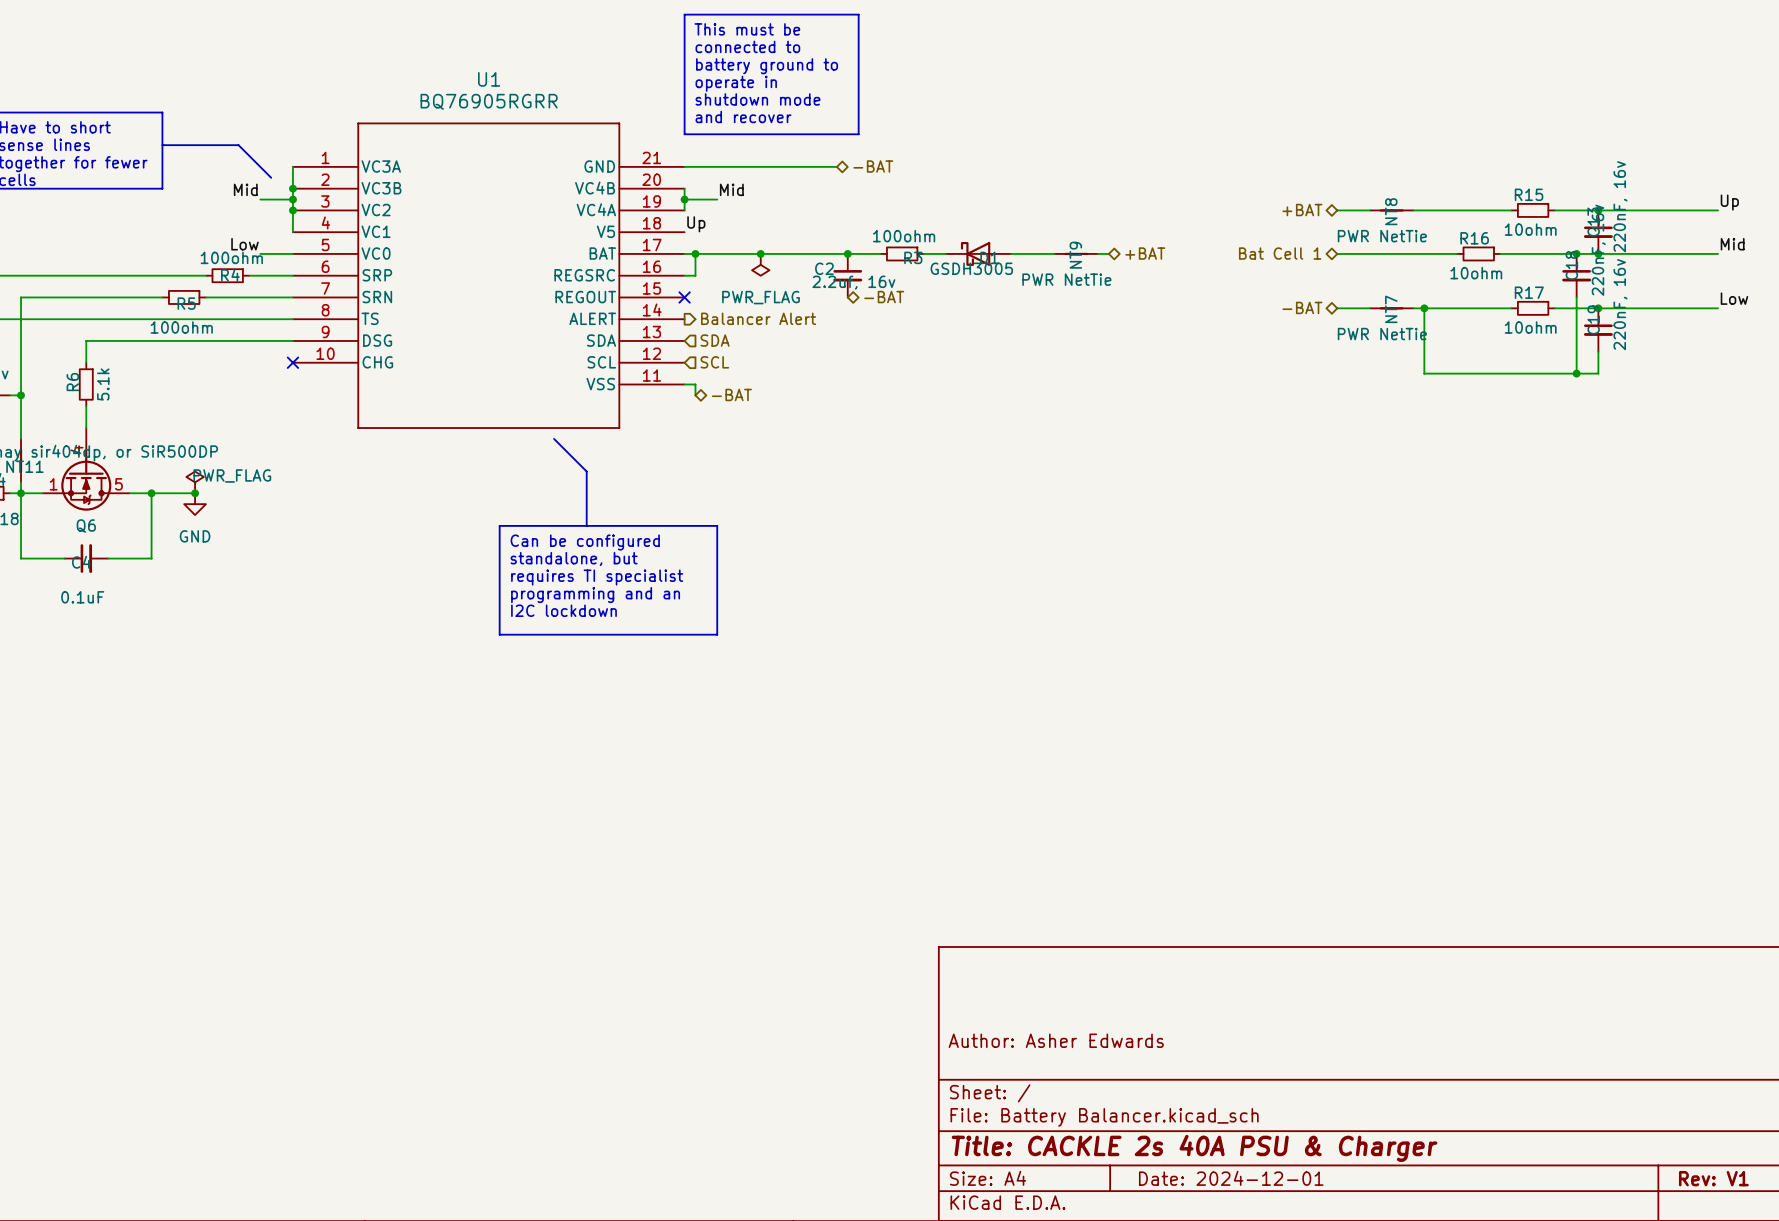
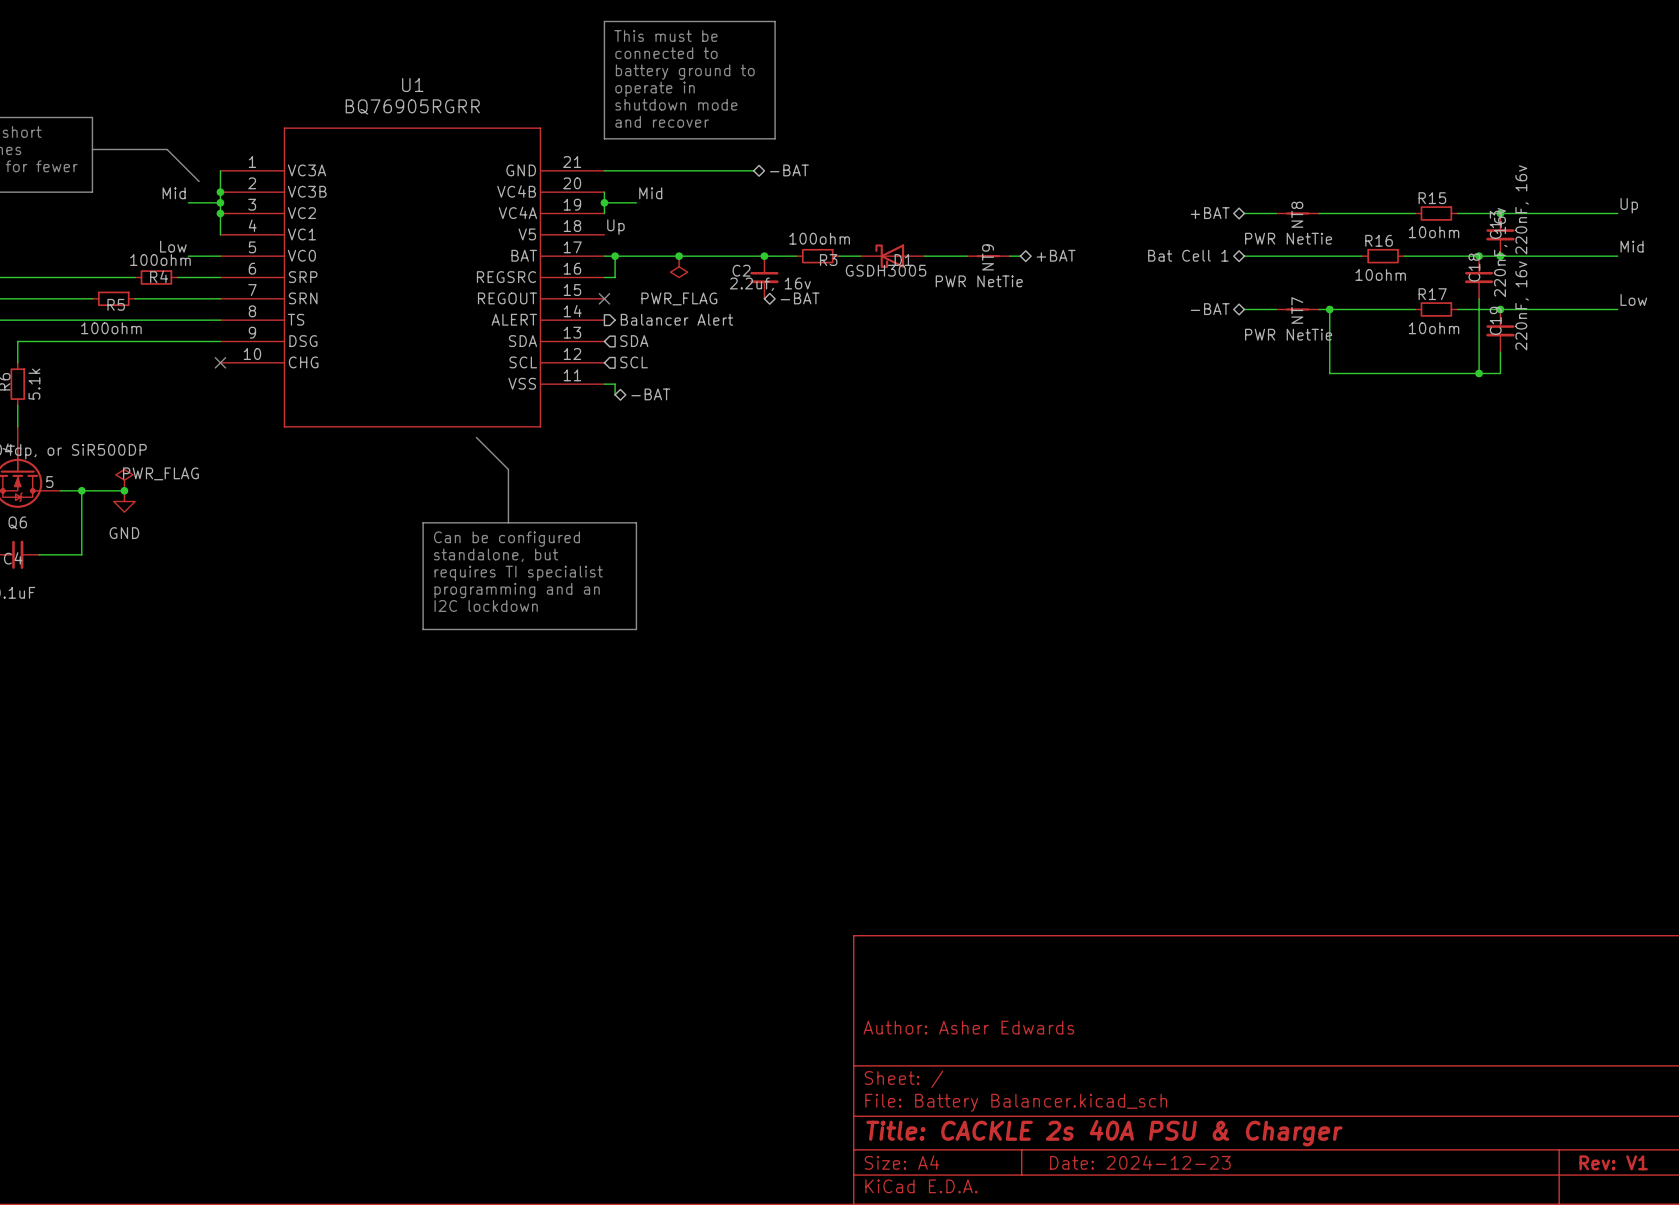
title block: Date: 2024-12-01 (1231, 1178) -> Date: 2024-12-23 (1140, 1162)

